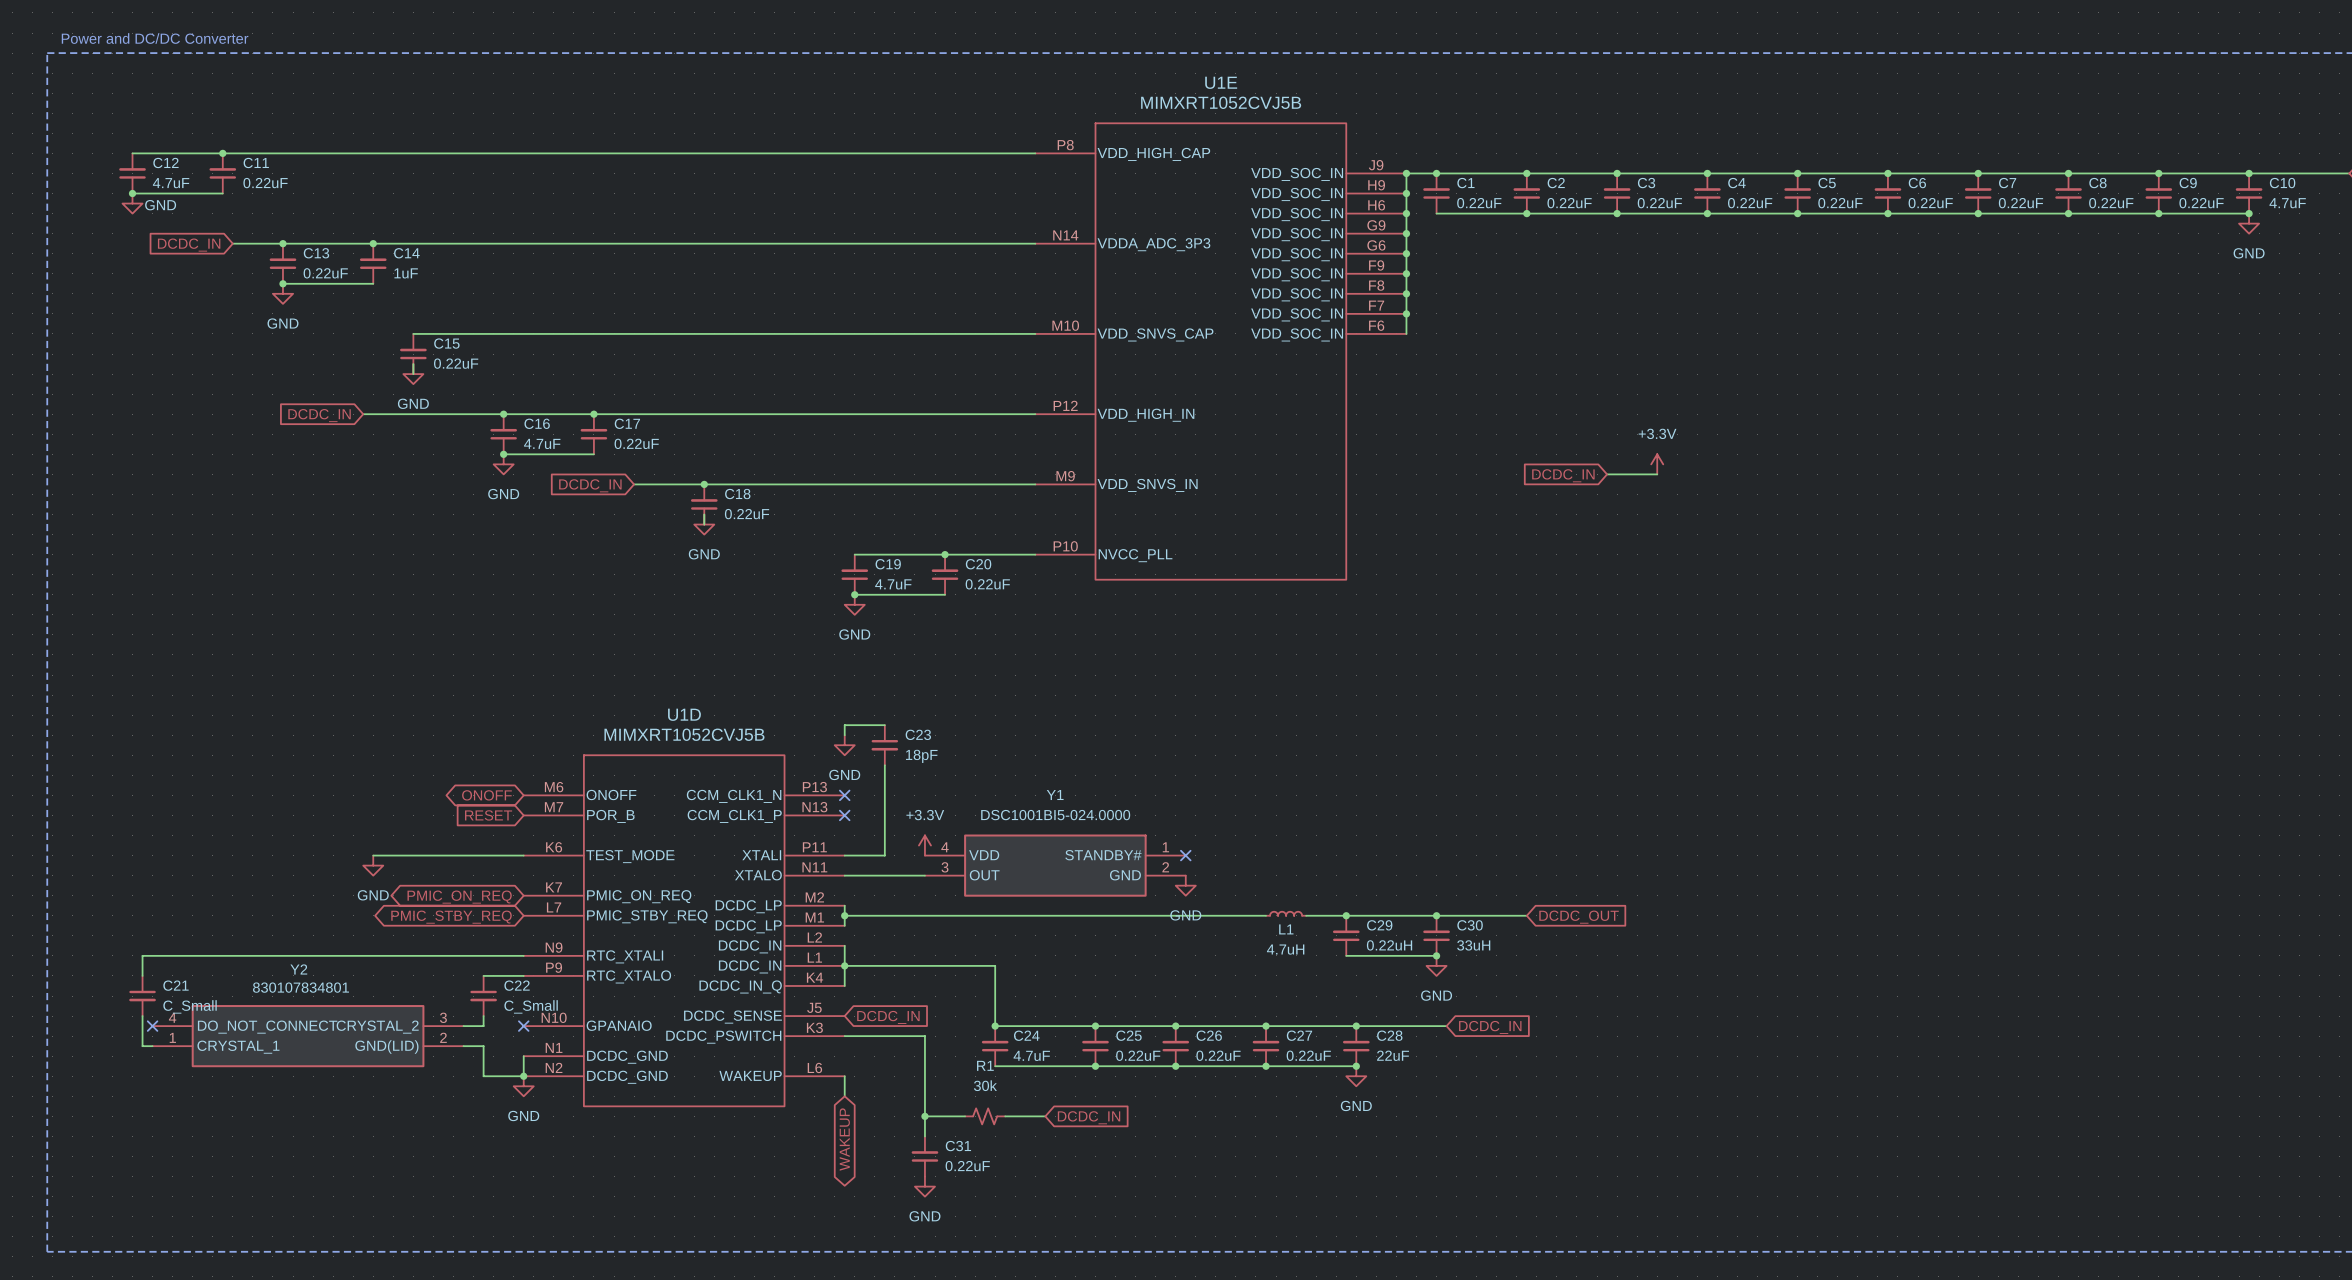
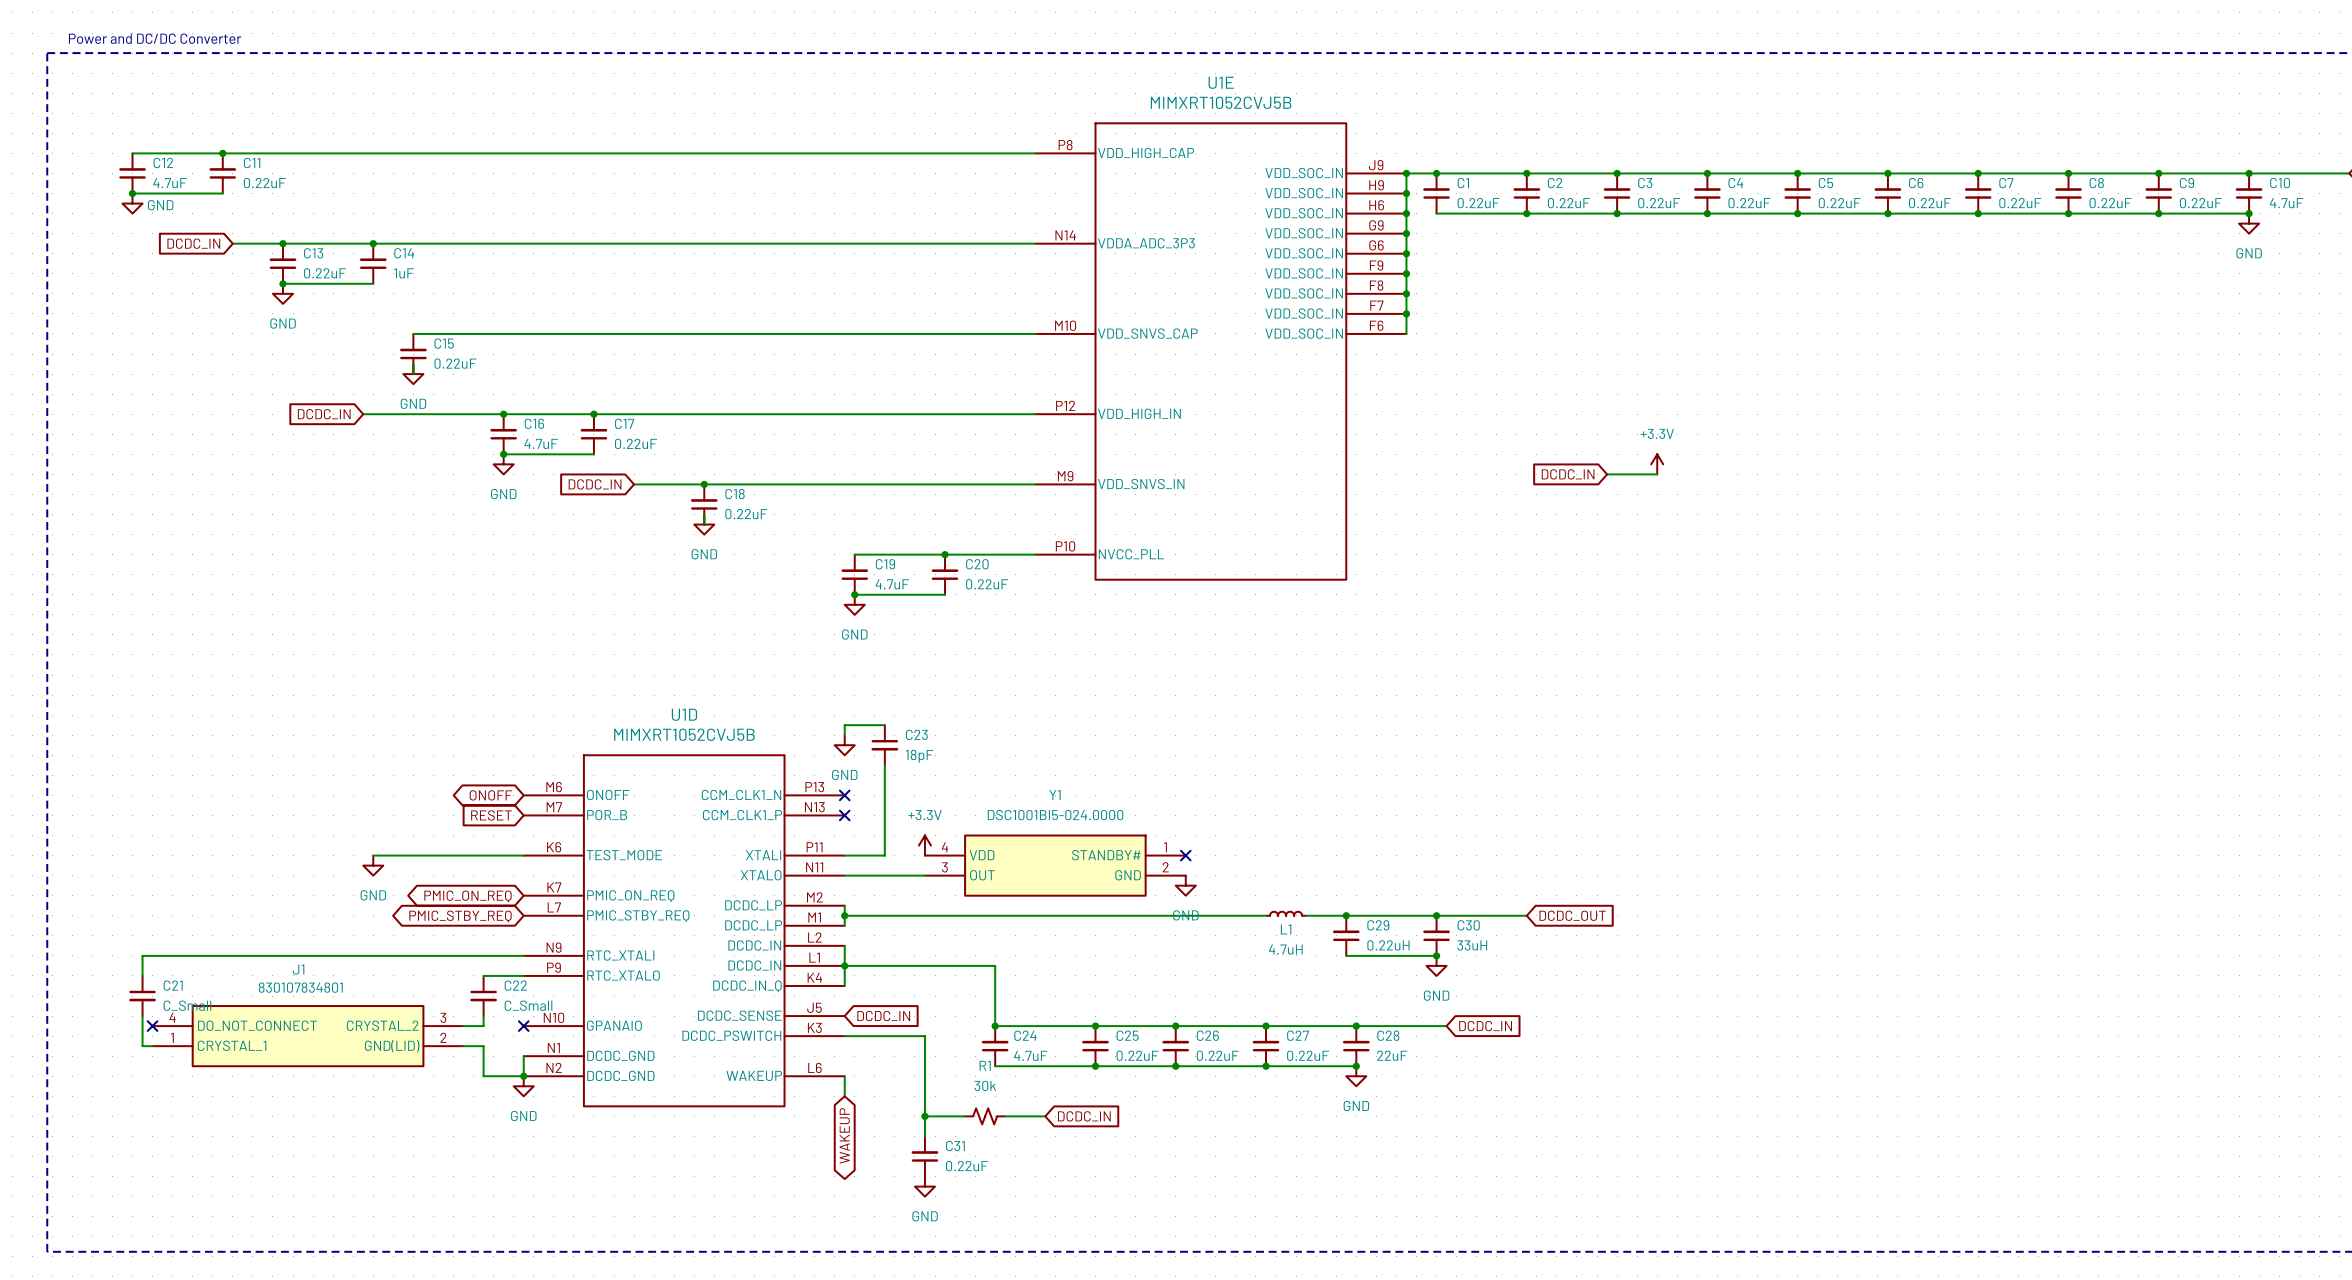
Y2 name: Y2 (298, 969) -> J1 (298, 969)

